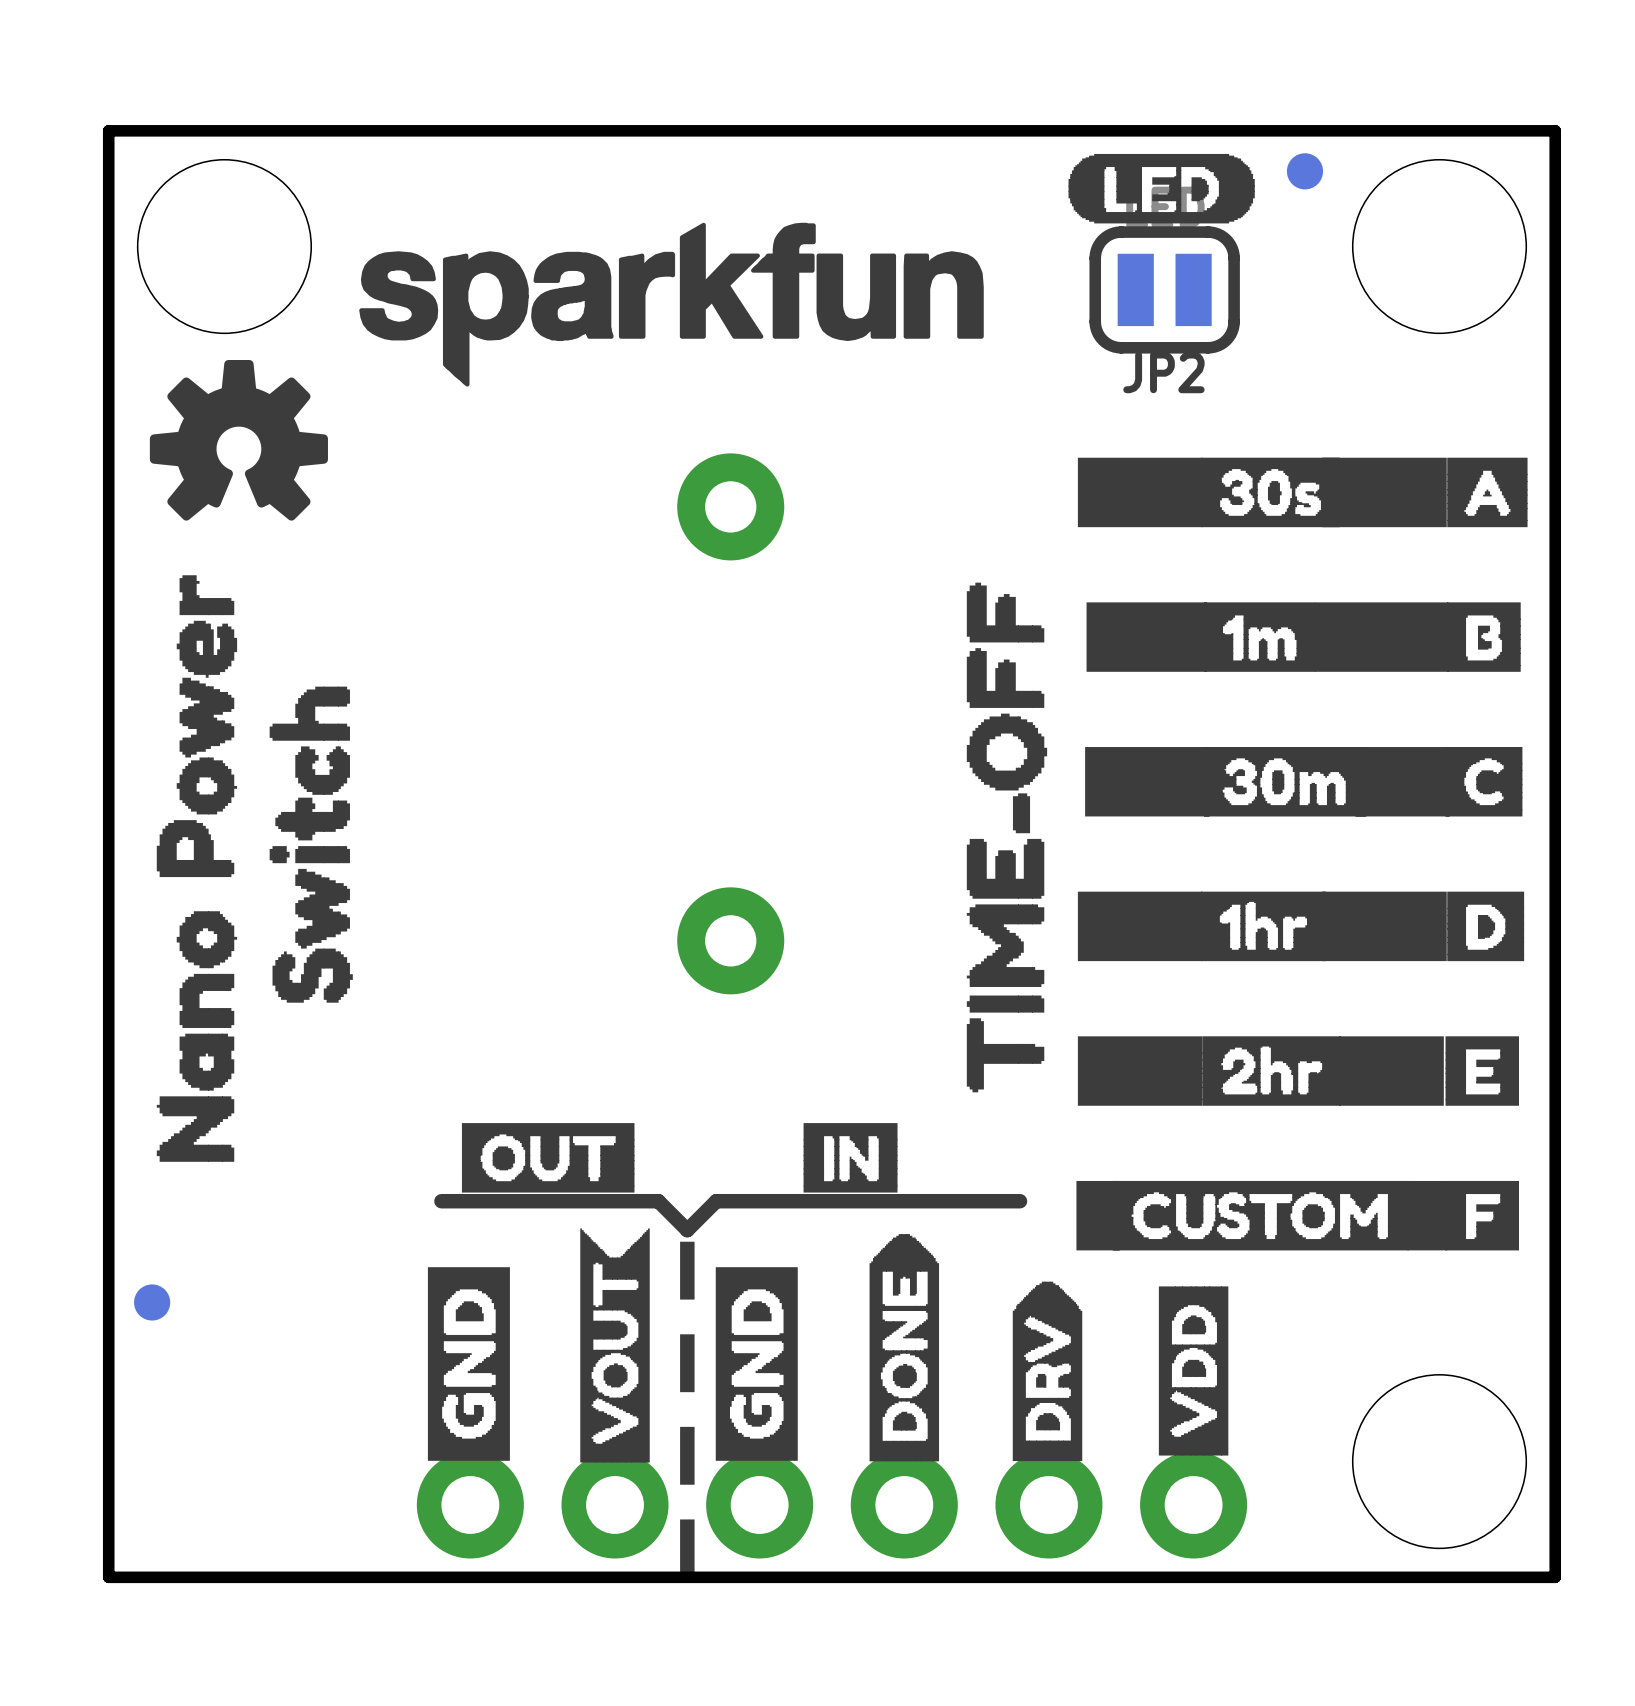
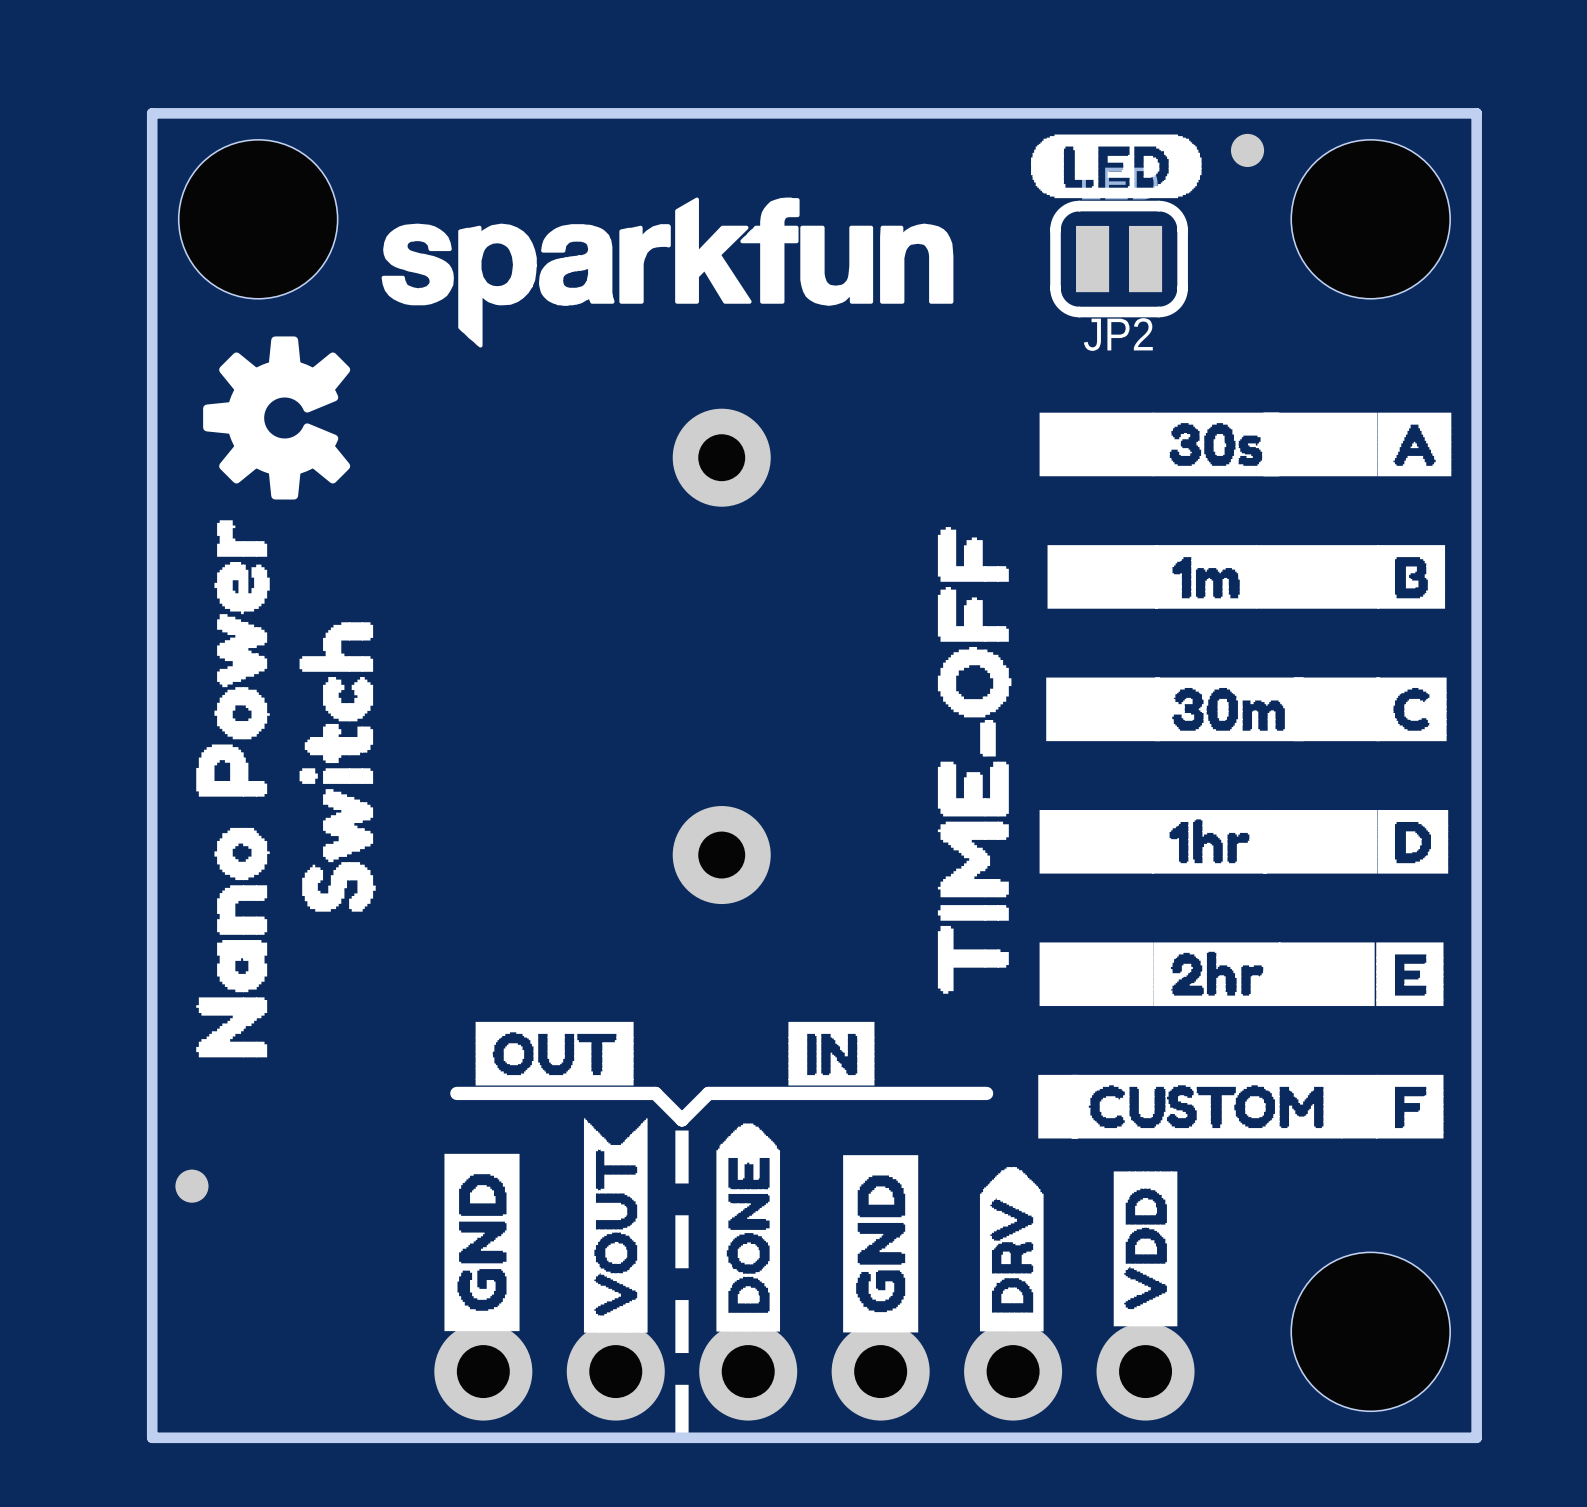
drawing shape: [149, 359, 328, 521] -> [203, 336, 351, 500]
drawing position: (904, 1347) -> (748, 1227)
drawing position: (756, 1364) -> (880, 1243)

